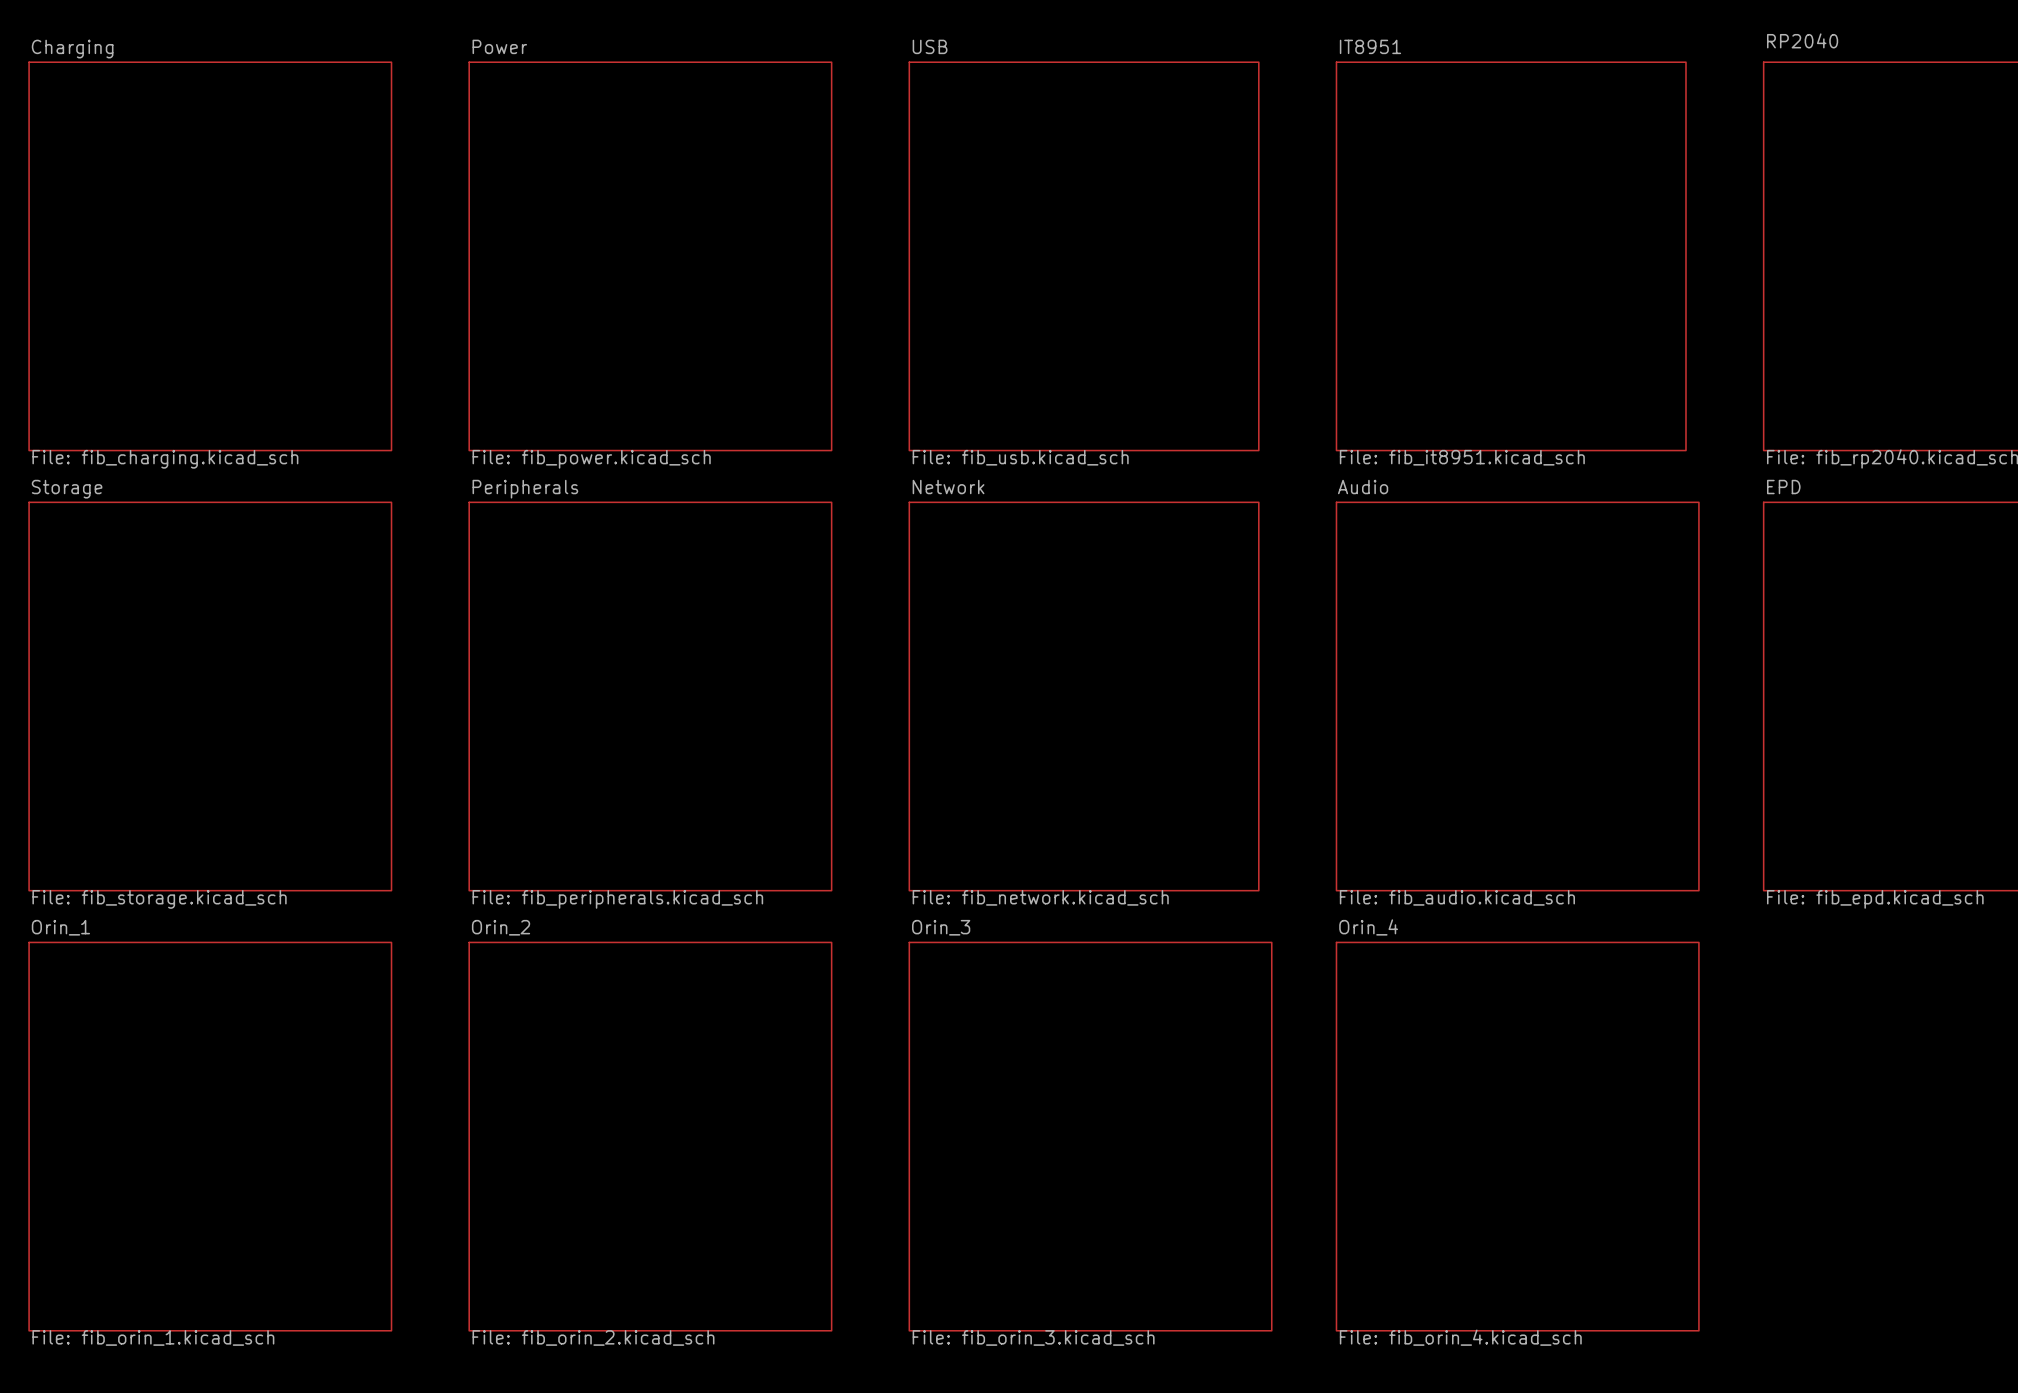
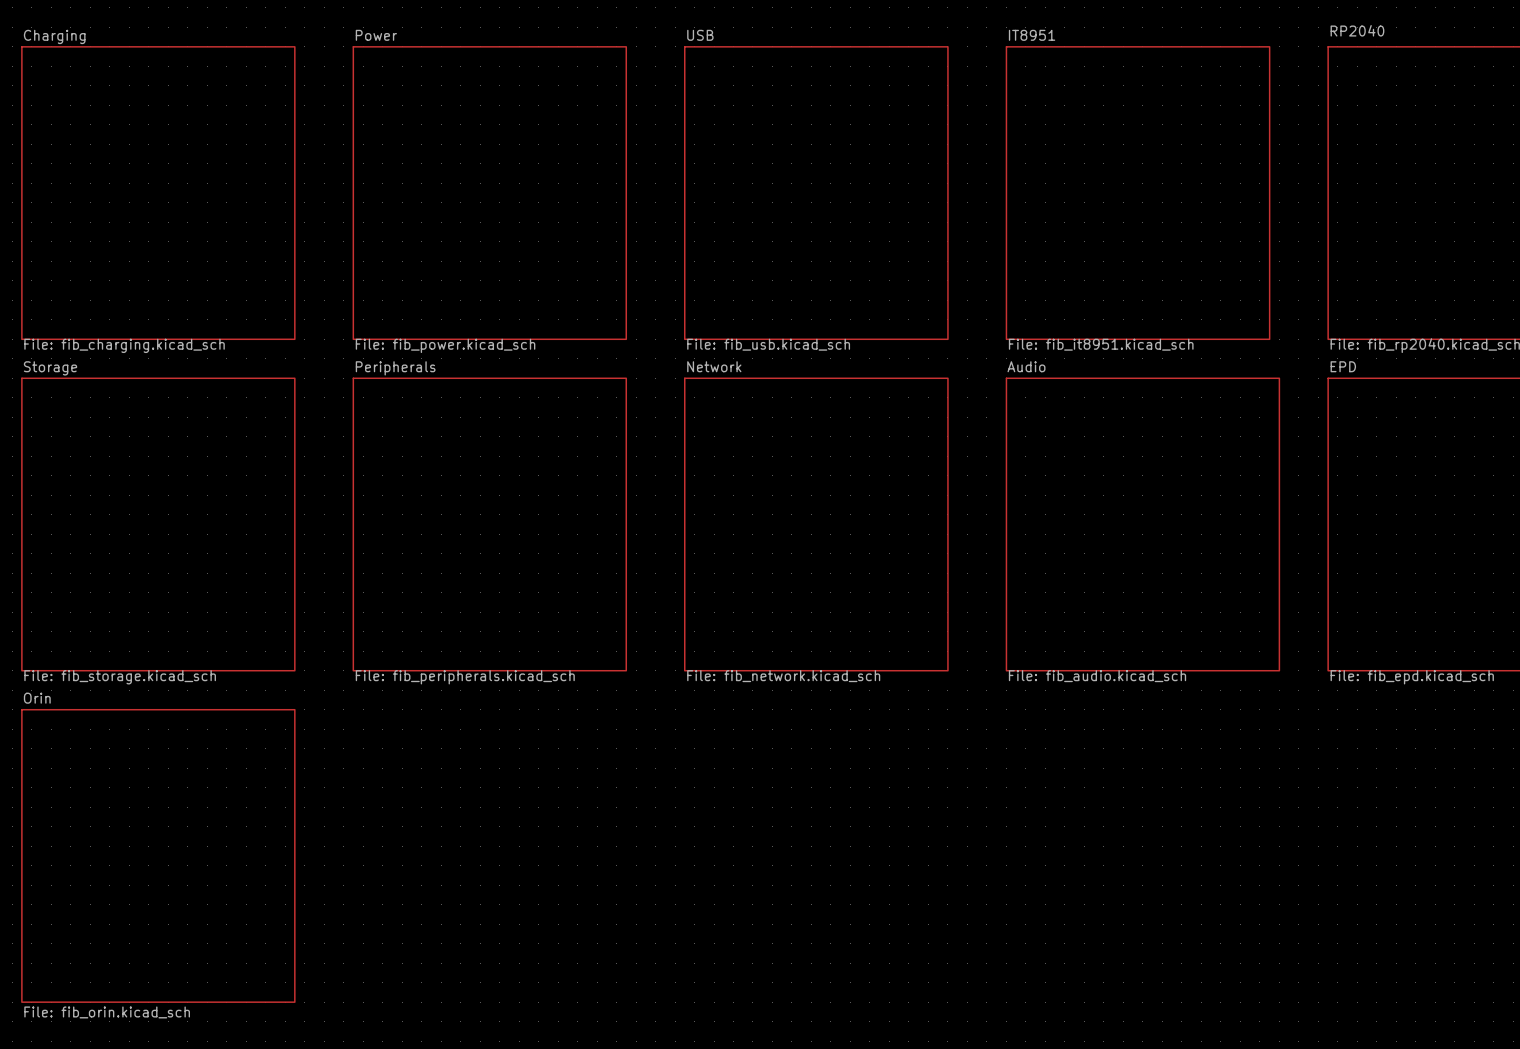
sheet Orin_1 name: Orin_1 (60, 927) -> Orin (37, 698)
sheet Orin_2: File: fib_orin_2.kicad_sch (650, 1136) -> none
sheet Orin_3: File: fib_orin_3.kicad_sch (1090, 1136) -> none
sheet Orin_4: File: fib_orin_4.kicad_sch (1517, 1136) -> none
sheet Orin_1 value: File: fib_orin_1.kicad_sch (153, 1337) -> File: fib_orin.kicad_sch (107, 1012)

